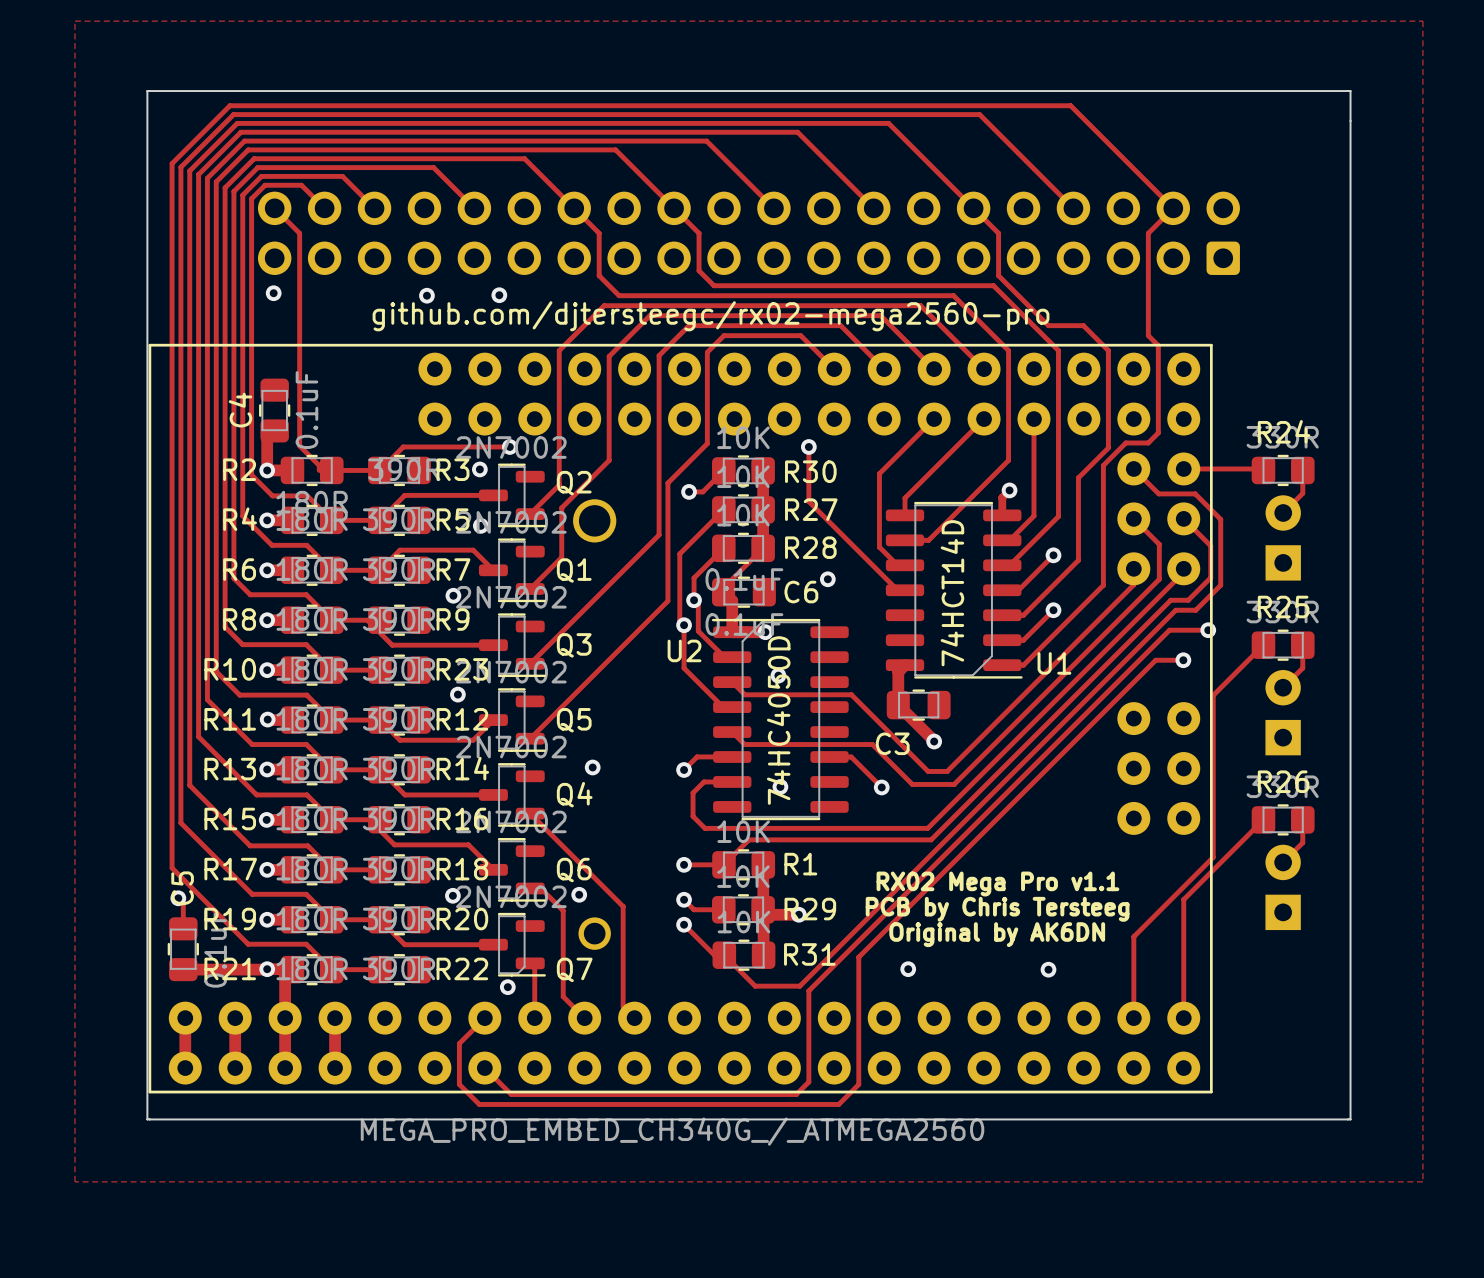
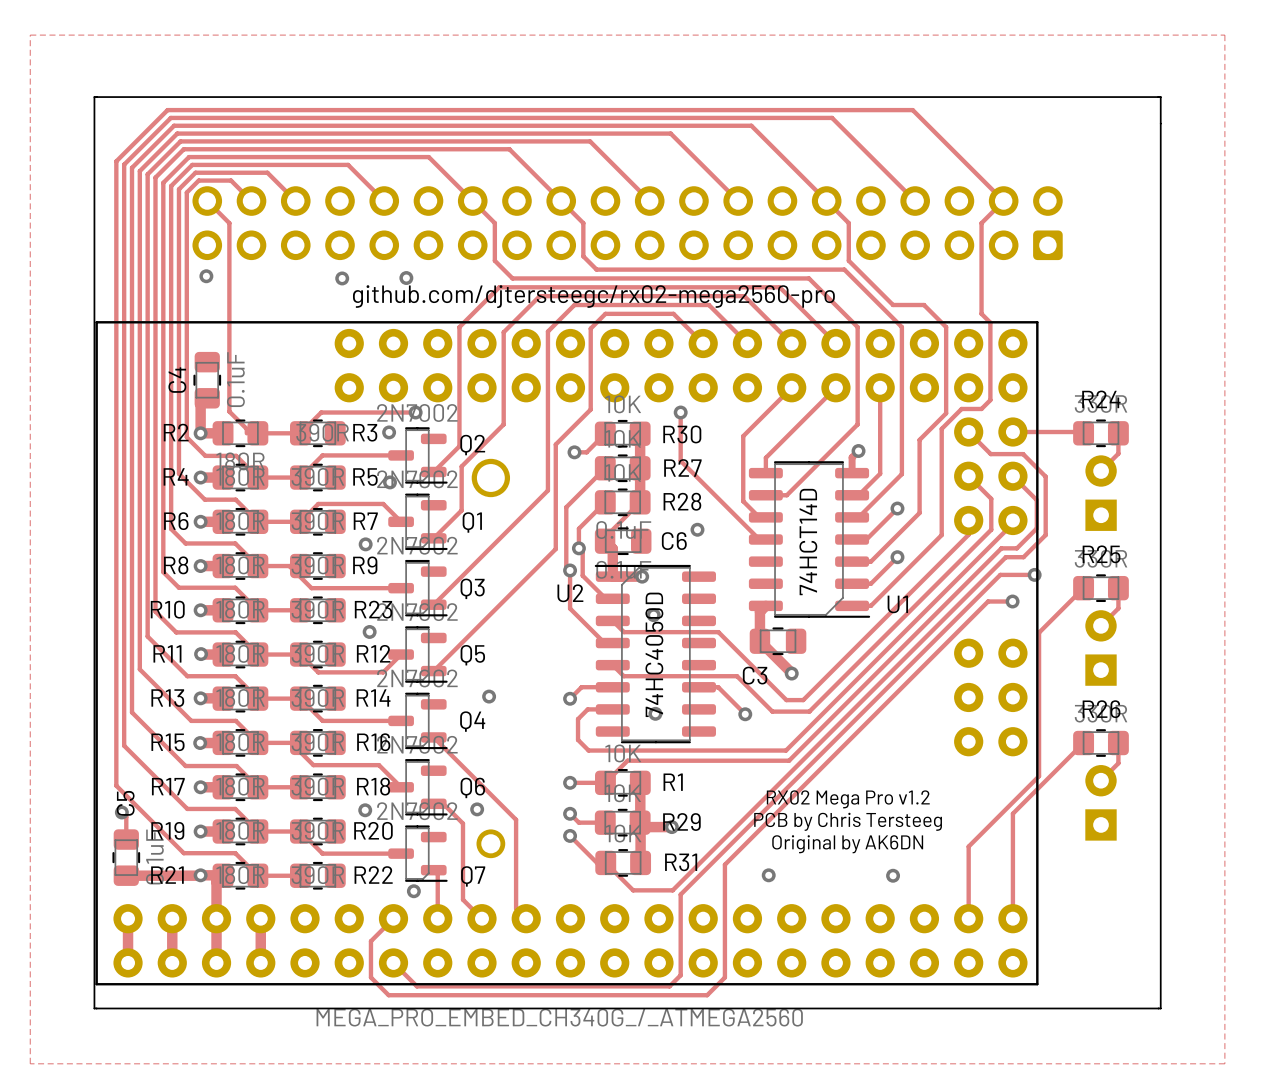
text: RX02 Mega Pro v1.1 (997, 883) -> RX02 Mega Pro v1.2 (848, 799)

